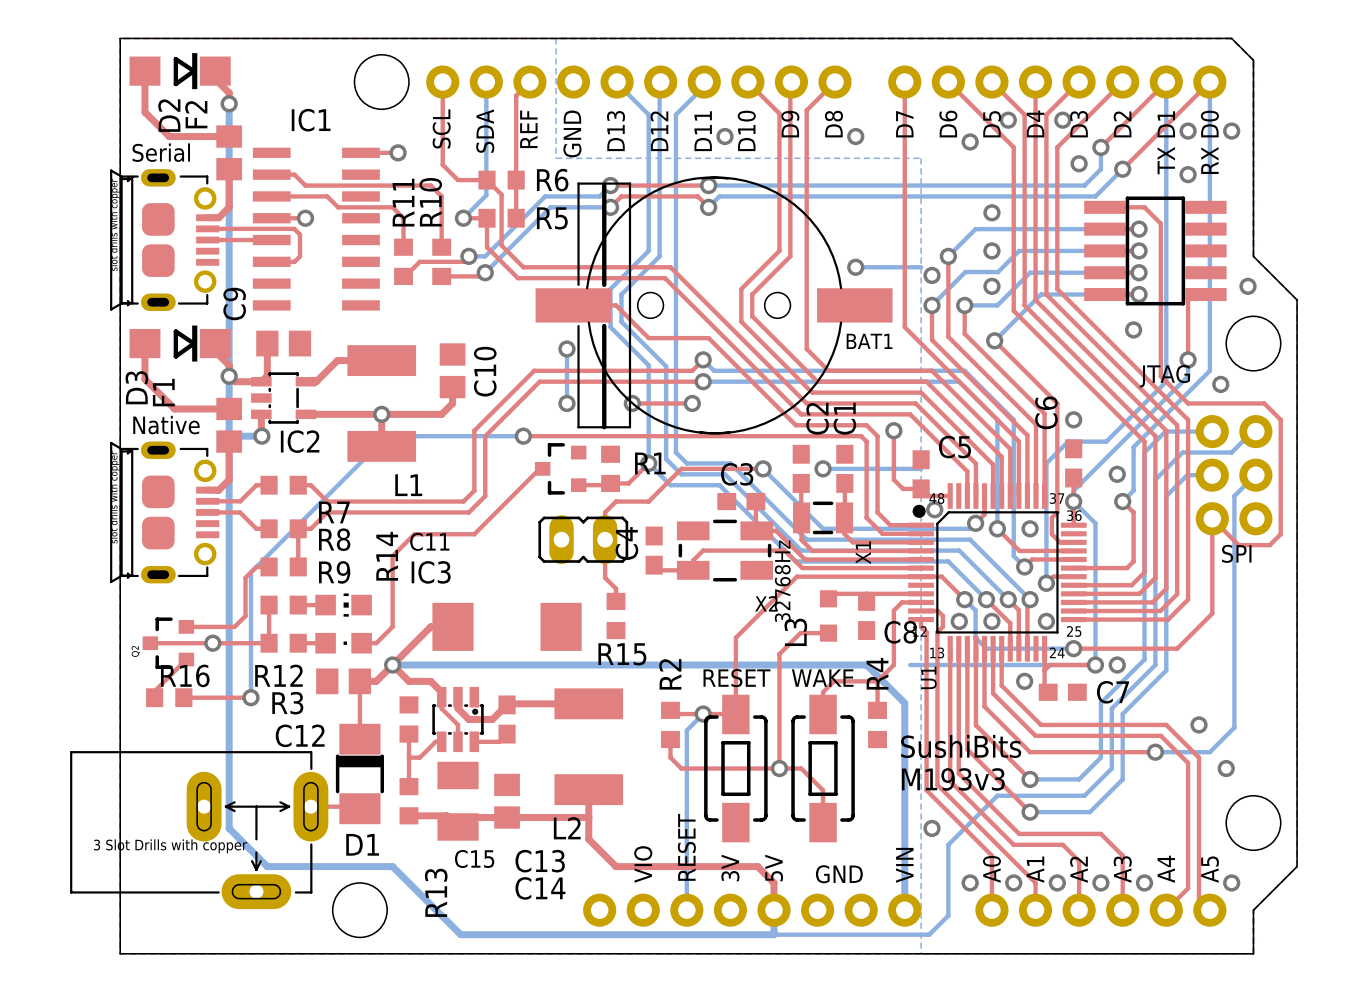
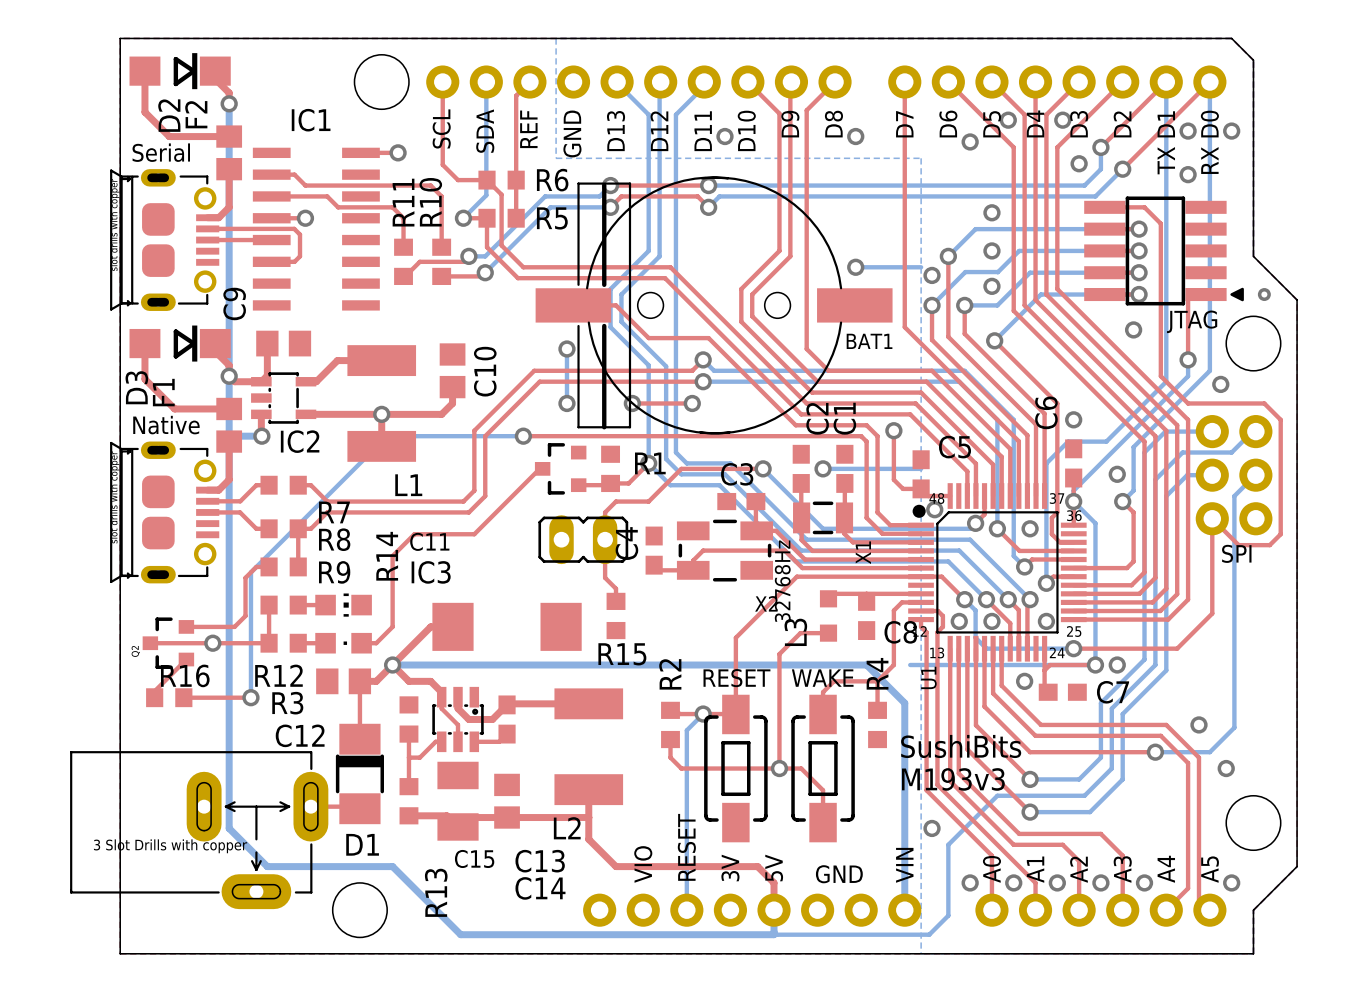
via: (1248, 286) -> none
drawing: none -> [1230, 287, 1244, 302]
via: none -> (1264, 294)
text position: JTAG (1164, 376) -> JTAG (1192, 321)

